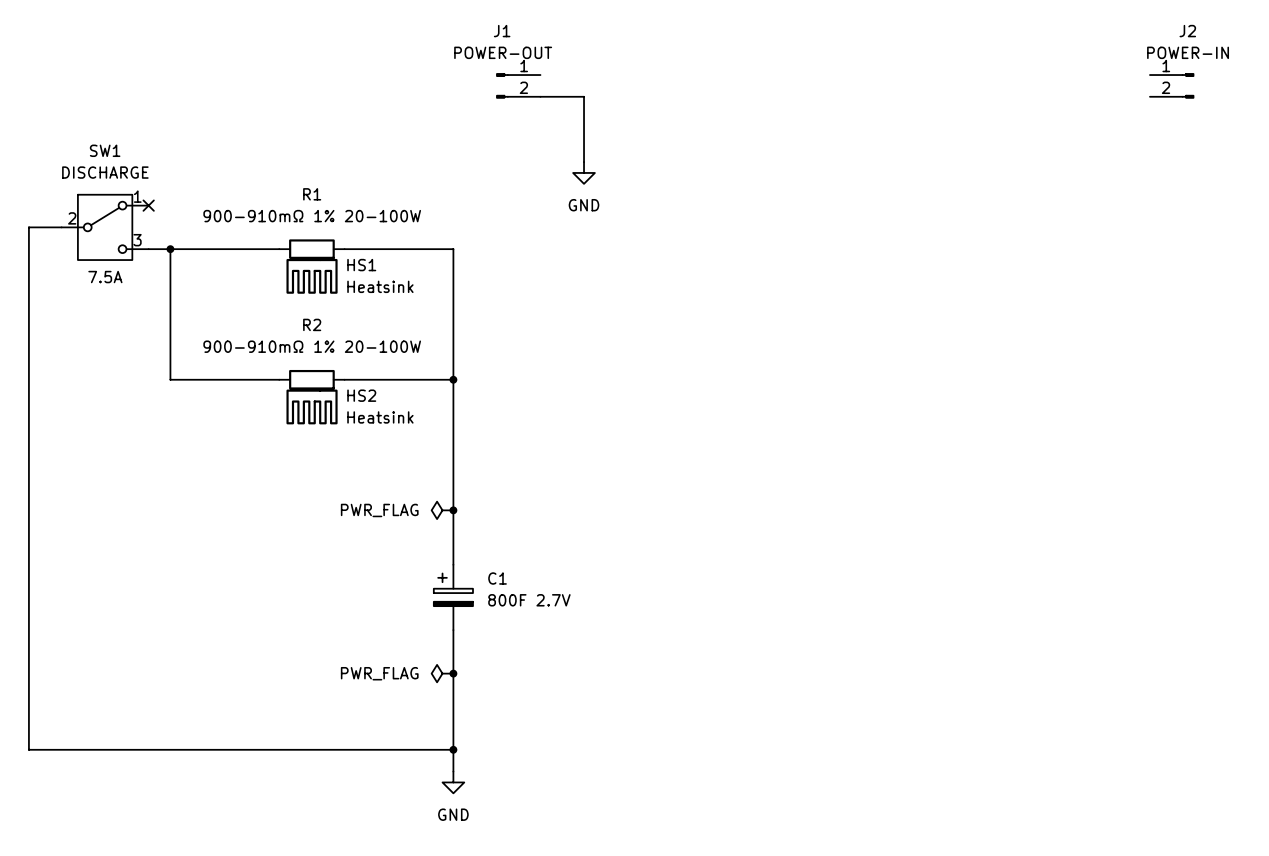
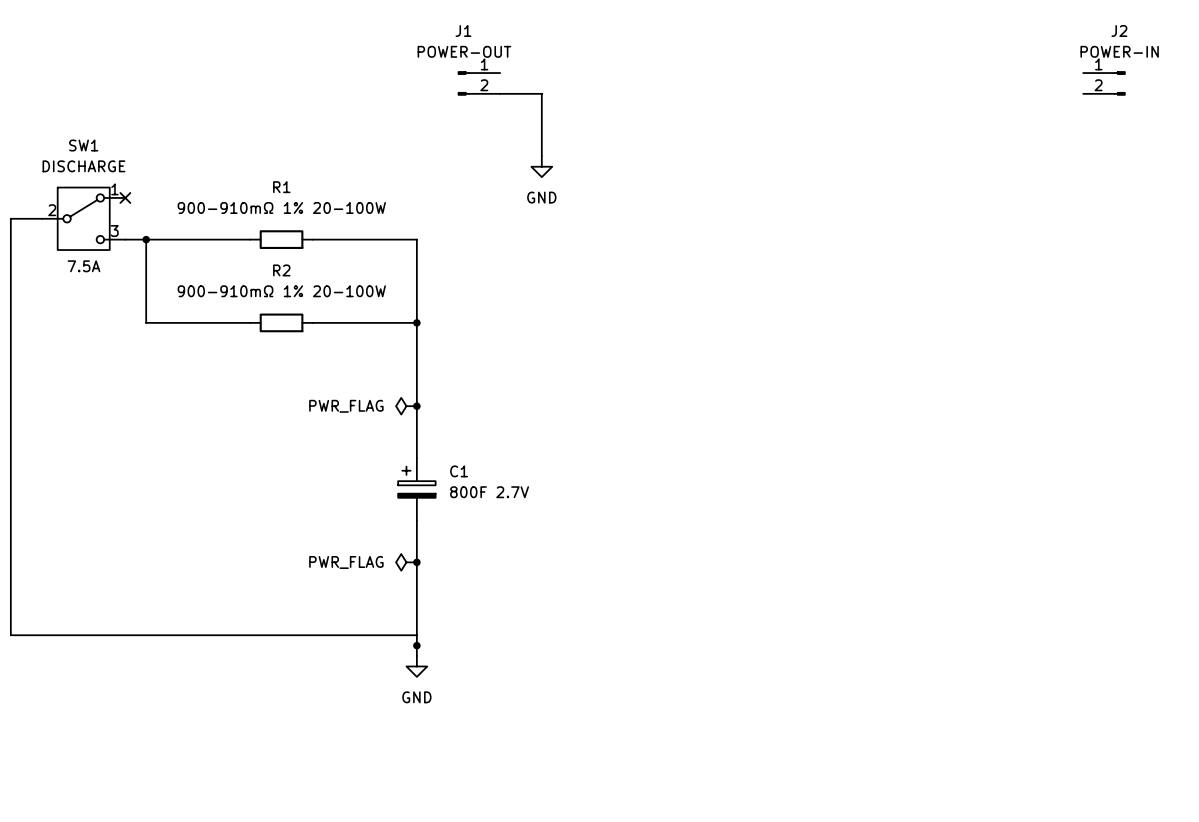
HS1: Heatsink (312, 276) -> none
wire: (170, 336) (170, 379) (279, 379) -> (146, 322) (250, 322)
junction: none -> (416, 322)
R2 position: (311, 379) -> (281, 322)
wire: (344, 379) (453, 379) -> (312, 322) (416, 322)
junction: (453, 379) -> none
HS2: Heatsink (312, 406) -> none
power symbol: none -> PWR_FLAG (406, 406)
junction: none -> (416, 406)
power symbol: PWR_FLAG (442, 510) -> none
junction: (453, 510) -> none
power symbol: none -> PWR_FLAG (406, 562)
junction: none -> (416, 562)
C1 position: (453, 597) -> (416, 489)
wire: (28, 662) (28, 749) (453, 749) -> (10, 635) (416, 635)
power symbol: PWR_FLAG (442, 673) -> none
wire: (453, 684) (453, 771) -> none
junction: (453, 749) -> none
power symbol position: GND (453, 782) -> GND (416, 666)

